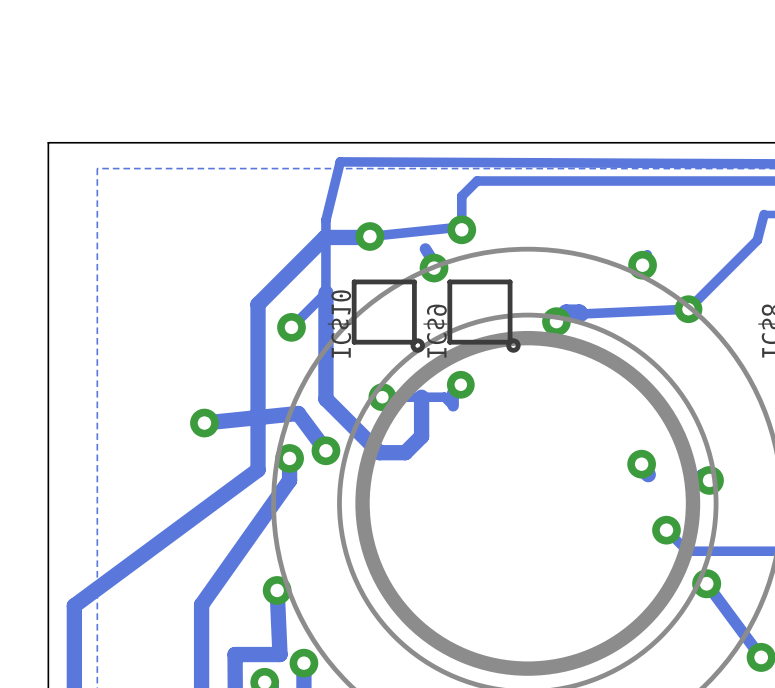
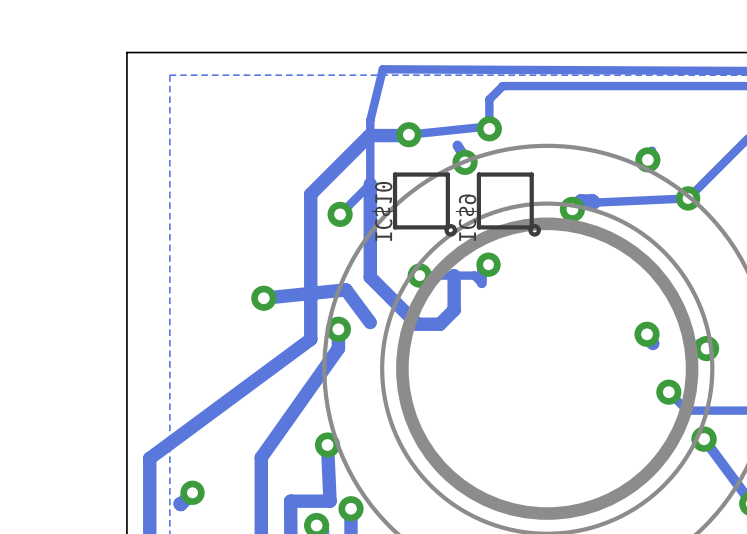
via: (325, 450) -> none
track: none -> (192, 492) (179, 503)
via: none -> (192, 492)

